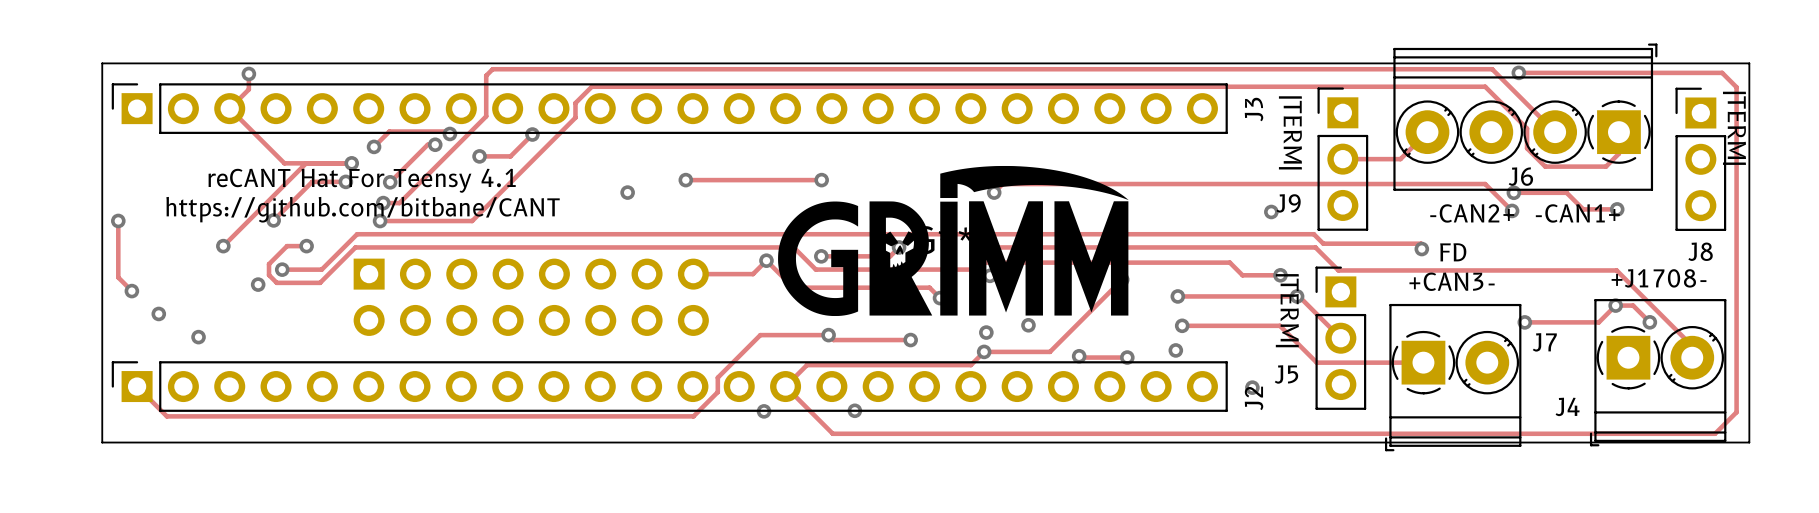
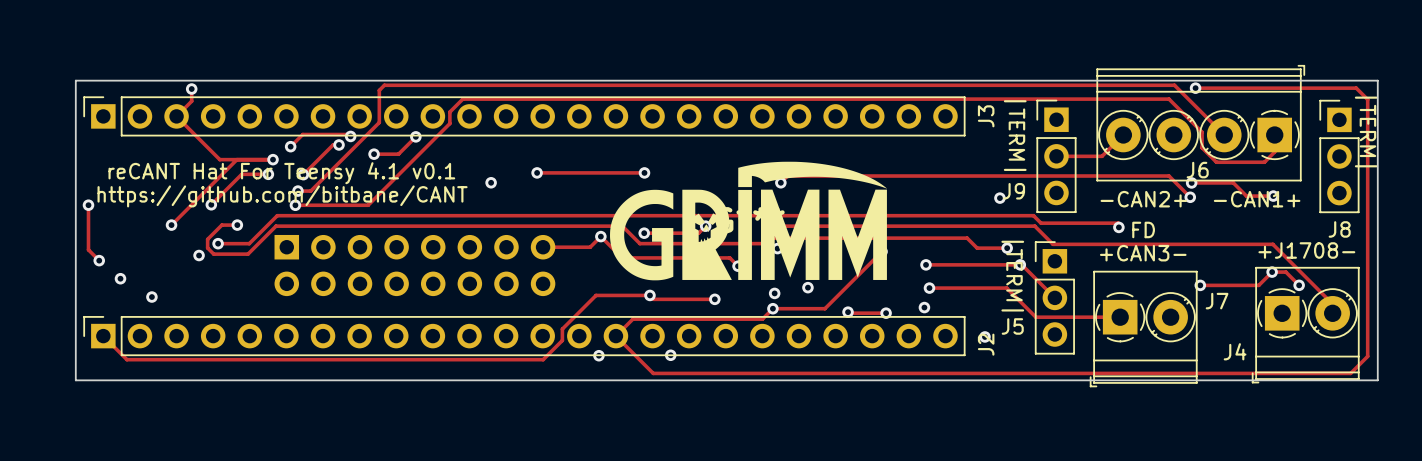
text: reCANT Hat For Teensy 4.1 (362, 180) -> reCANT Hat For Teensy 4.1 v0.1 (281, 173)

